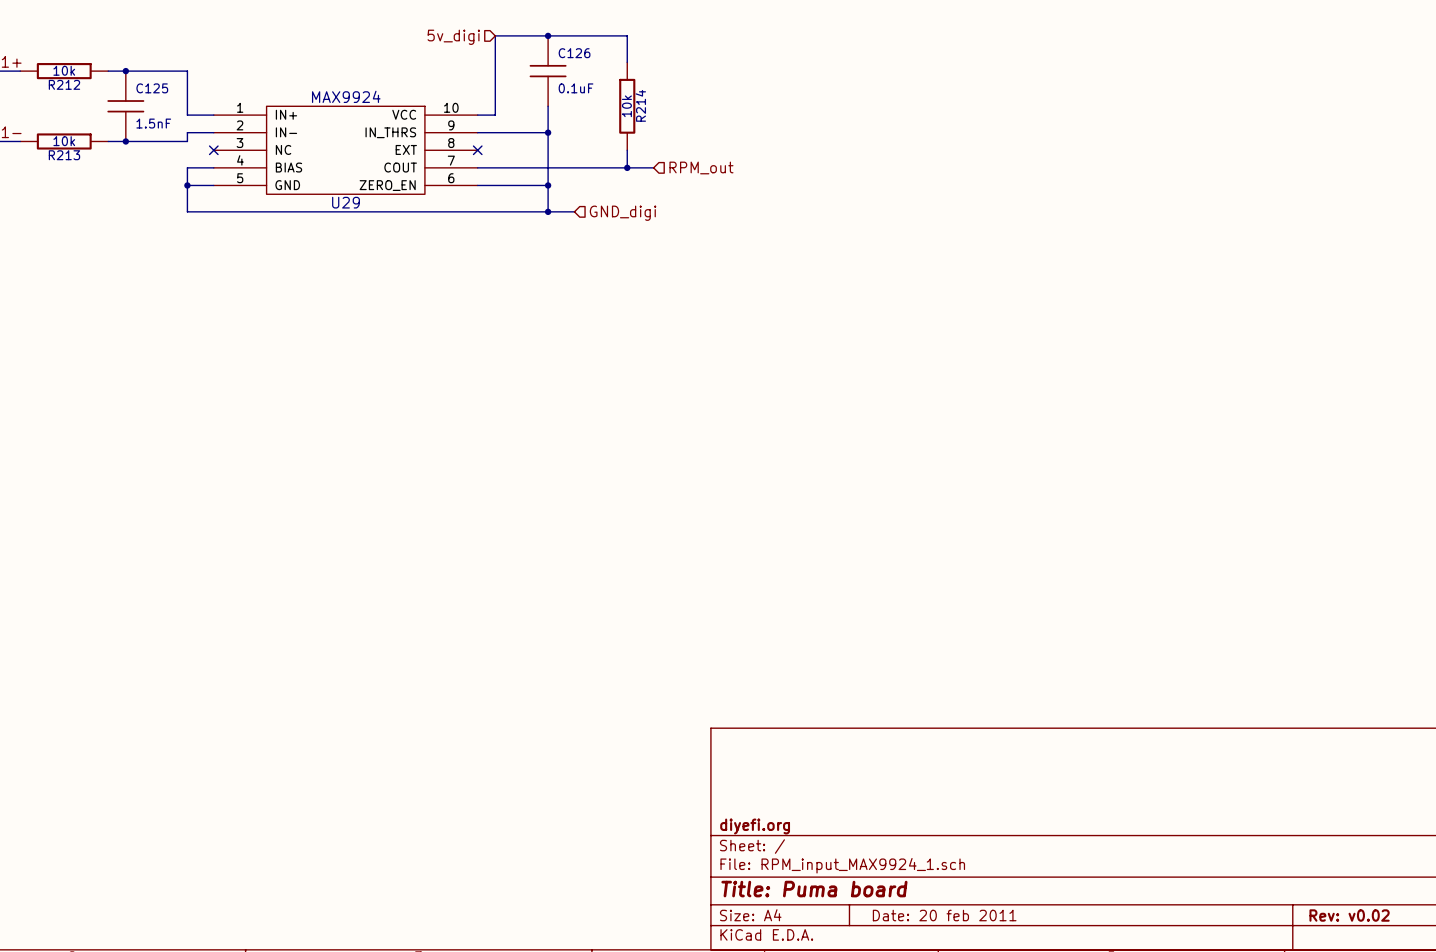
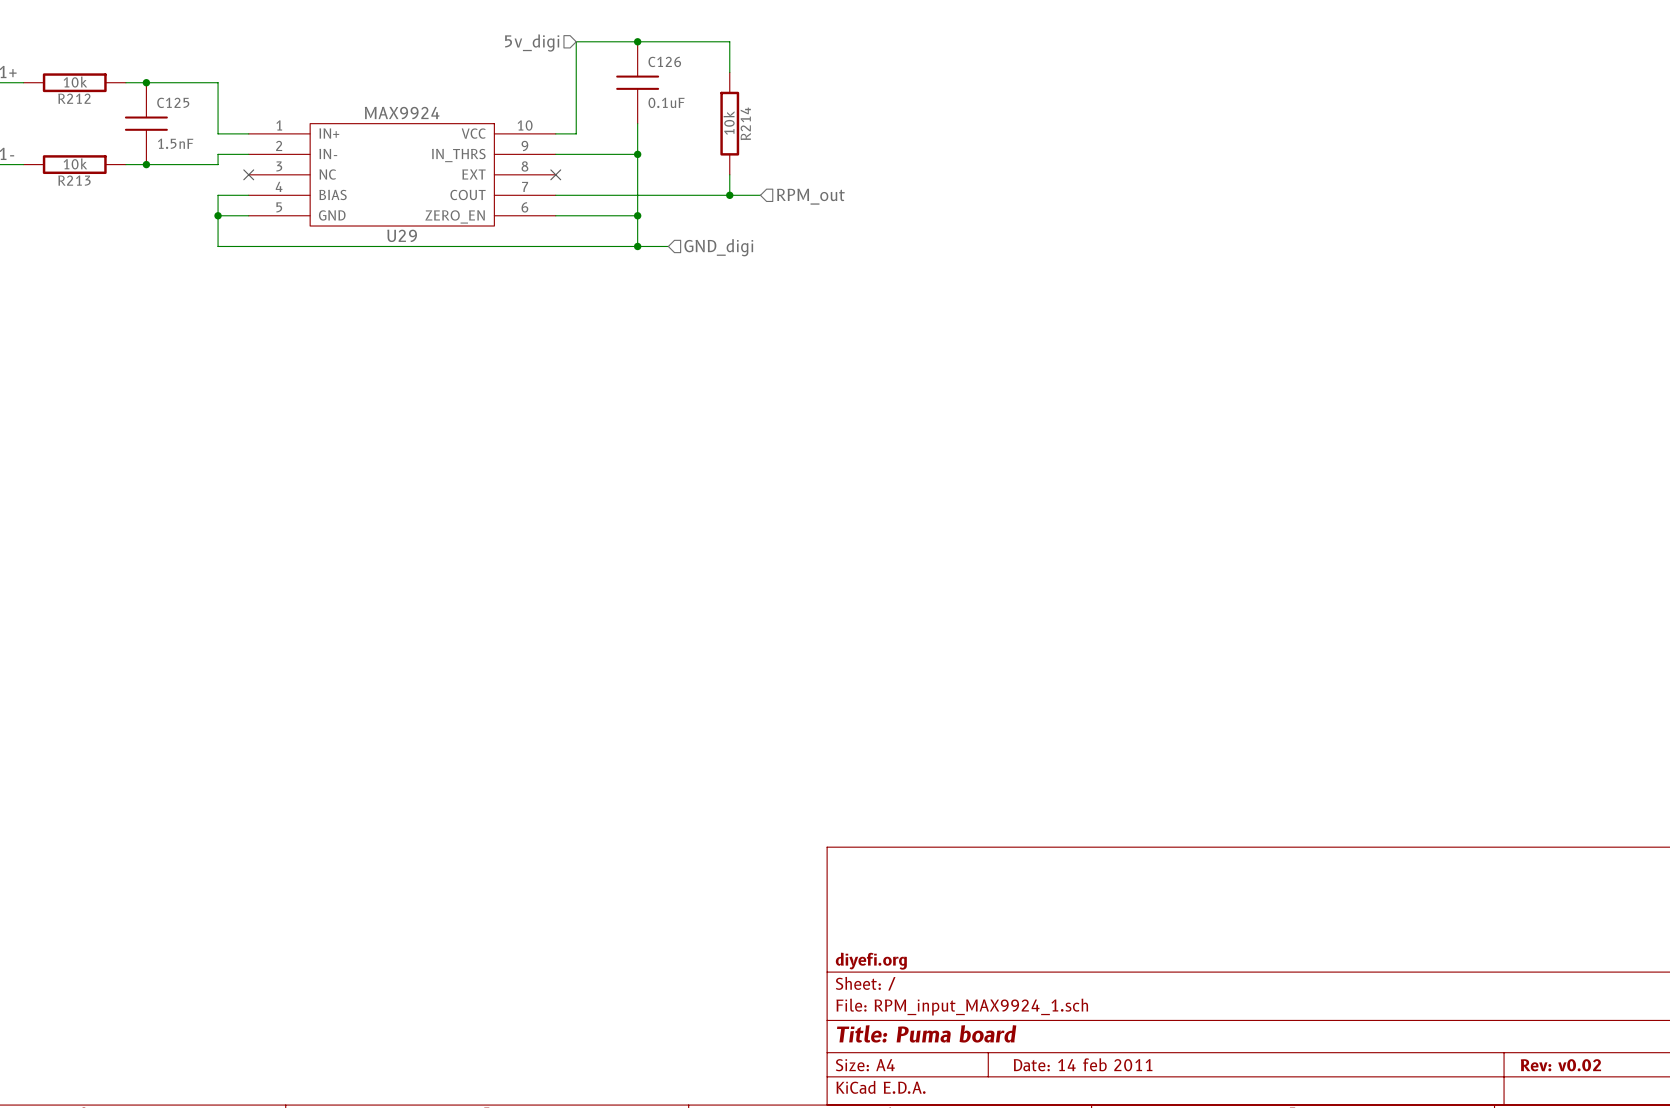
title block: Date: 20 feb 2011 (944, 915) -> Date: 14 feb 2011 (1083, 1064)

